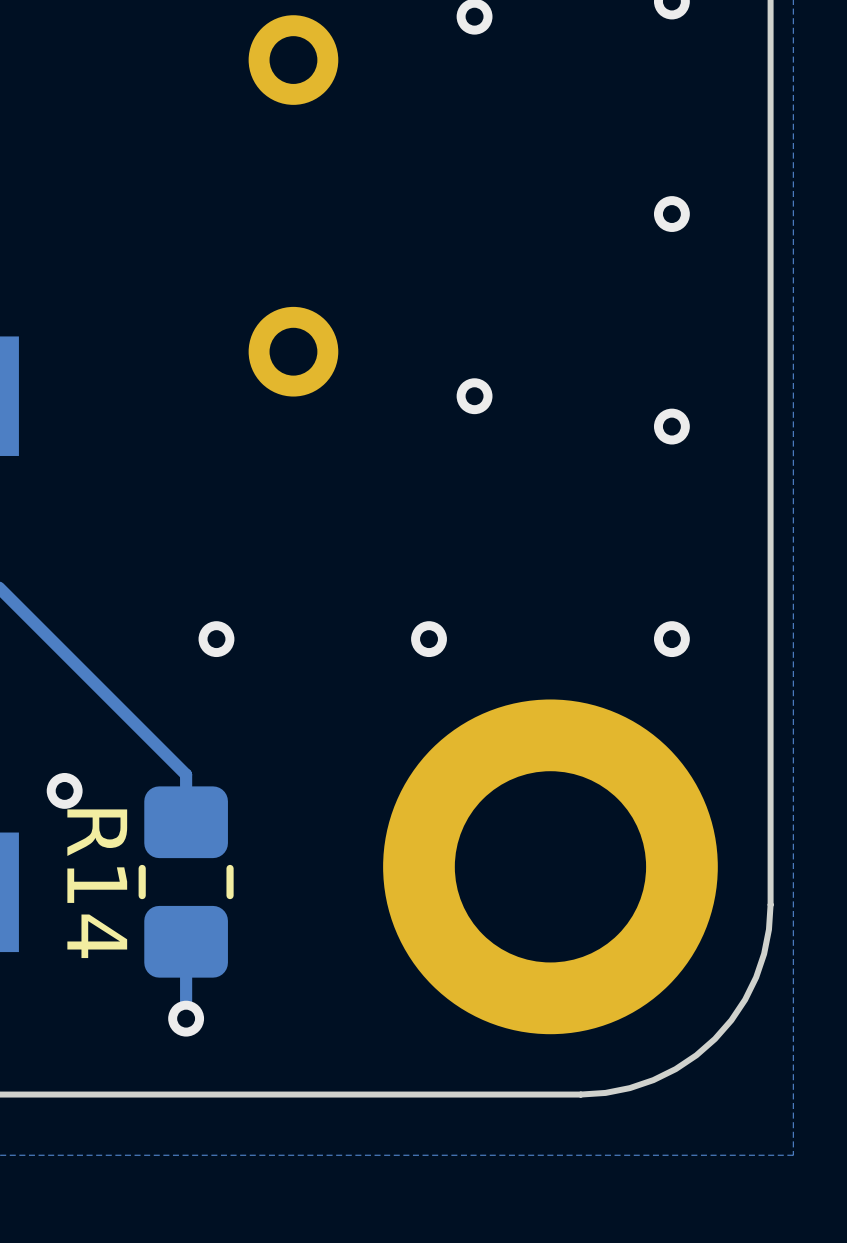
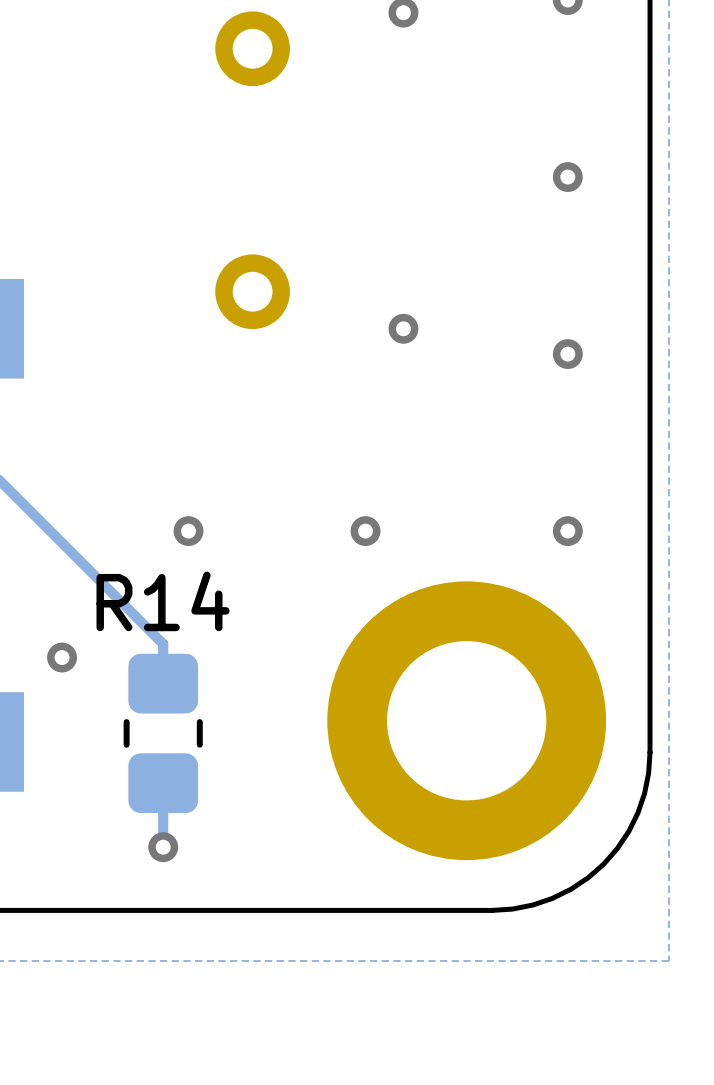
R14 name rotation: 0° (97, 883) -> 90° counterclockwise (163, 601)

